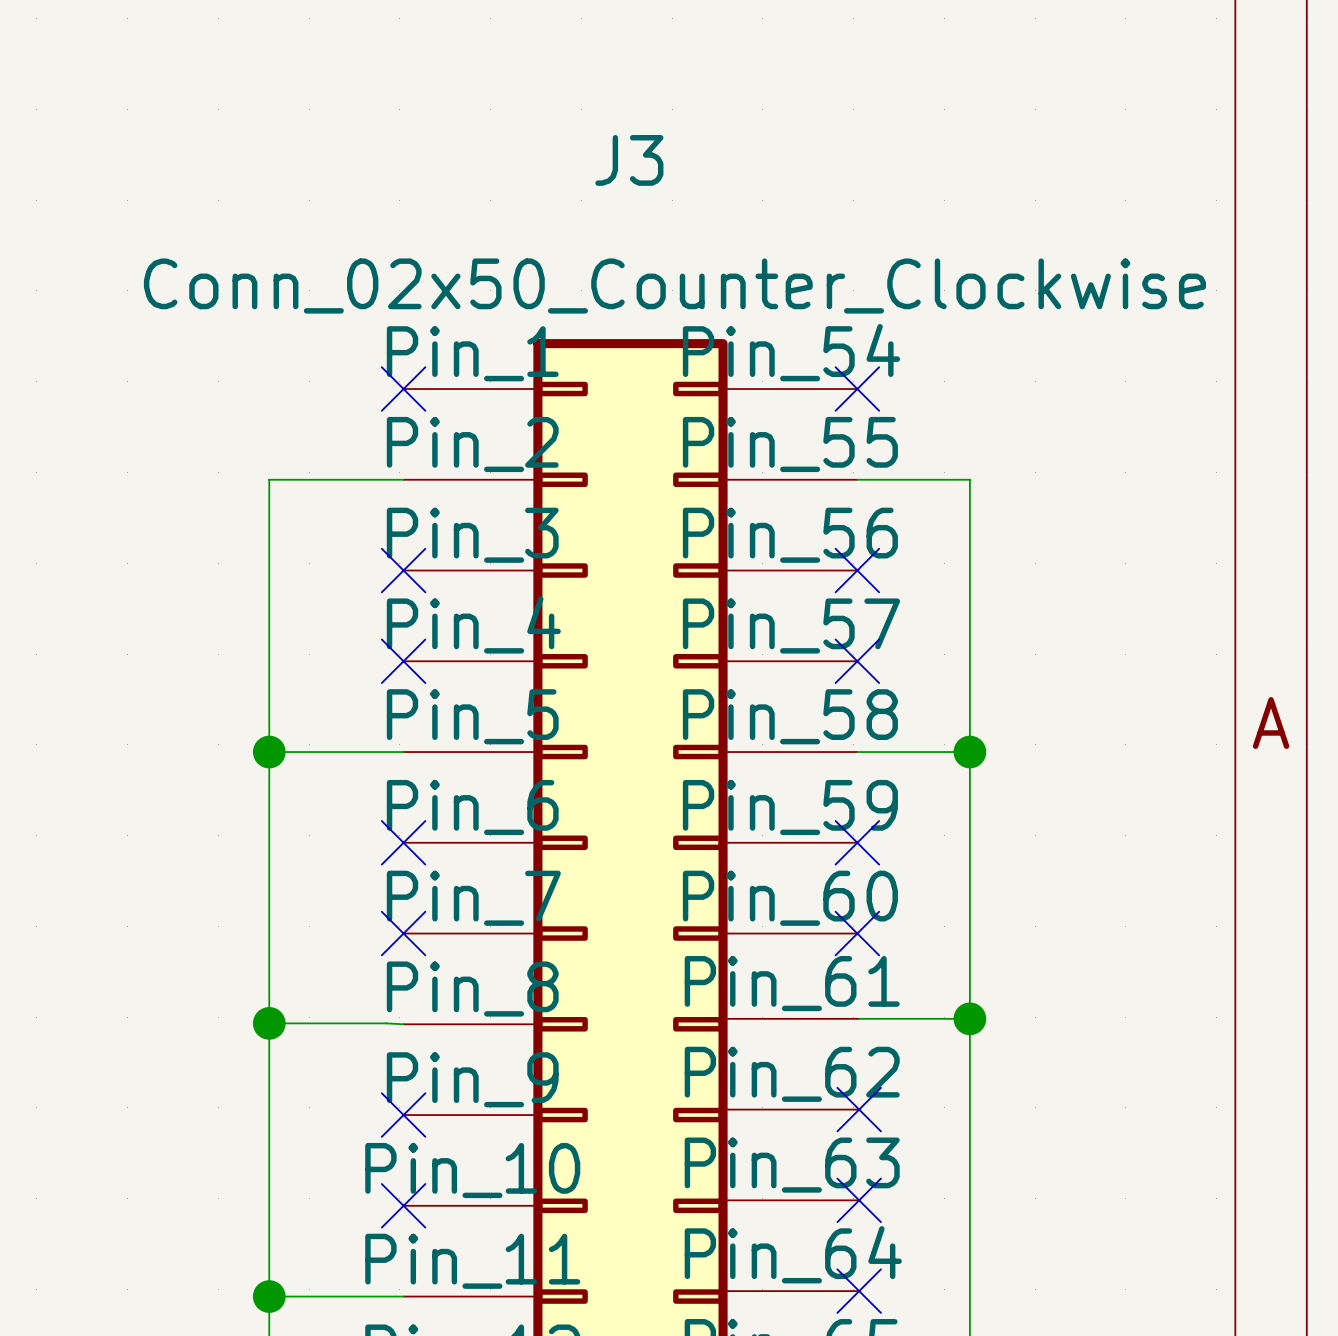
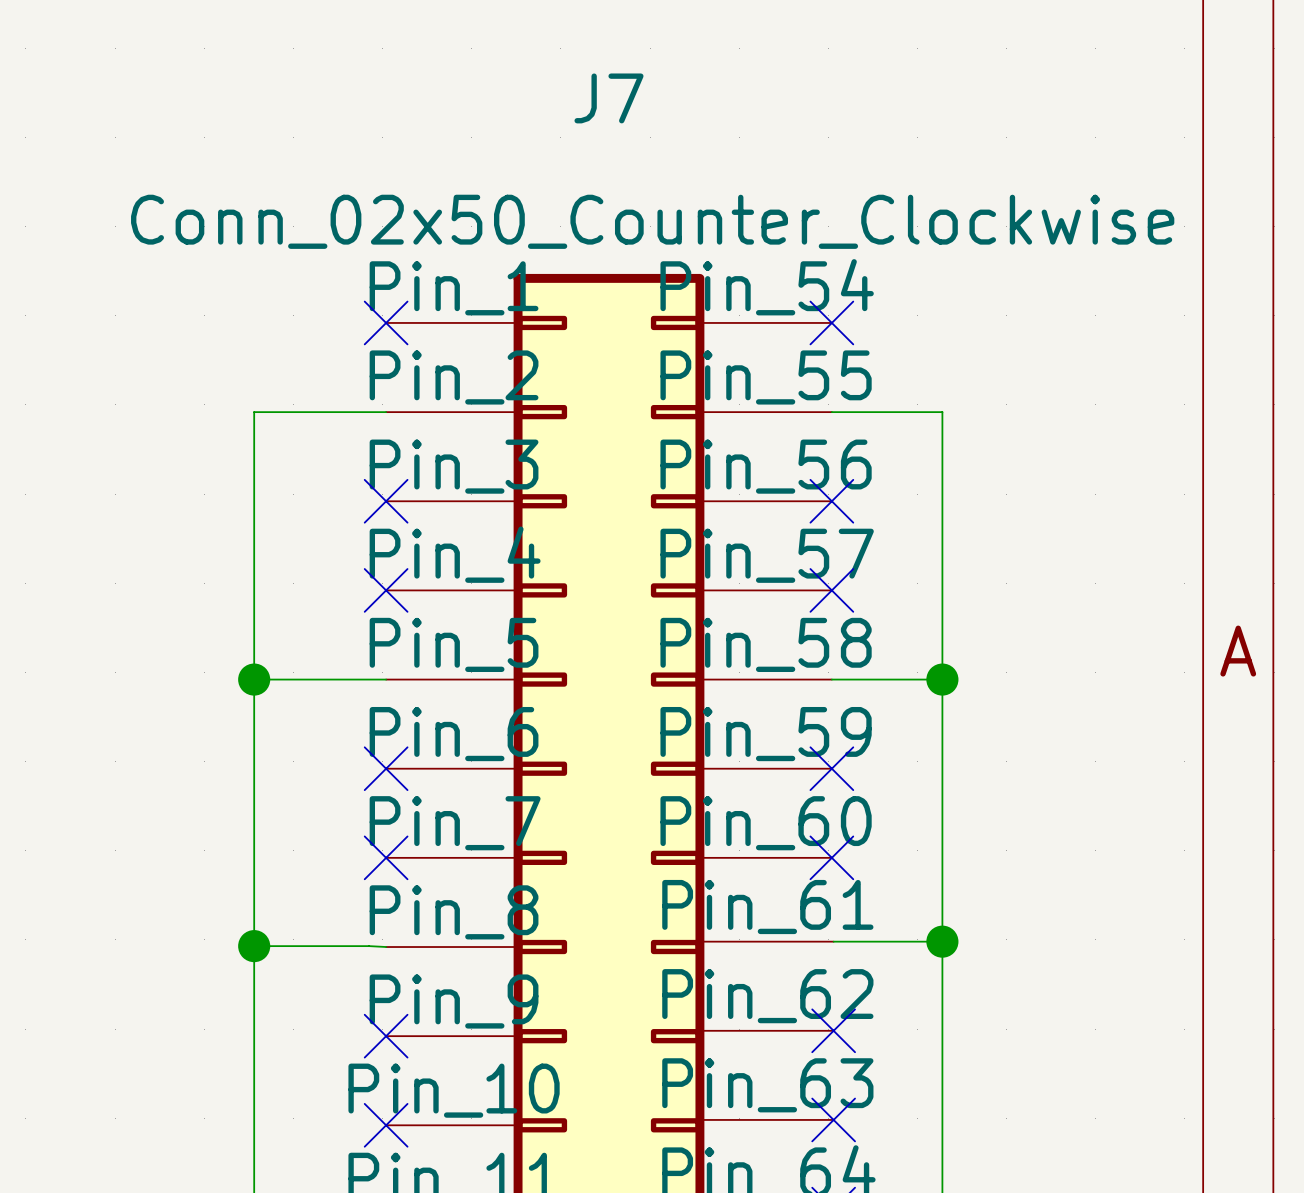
J3 name: J3 (629, 160) -> J7 (608, 98)

